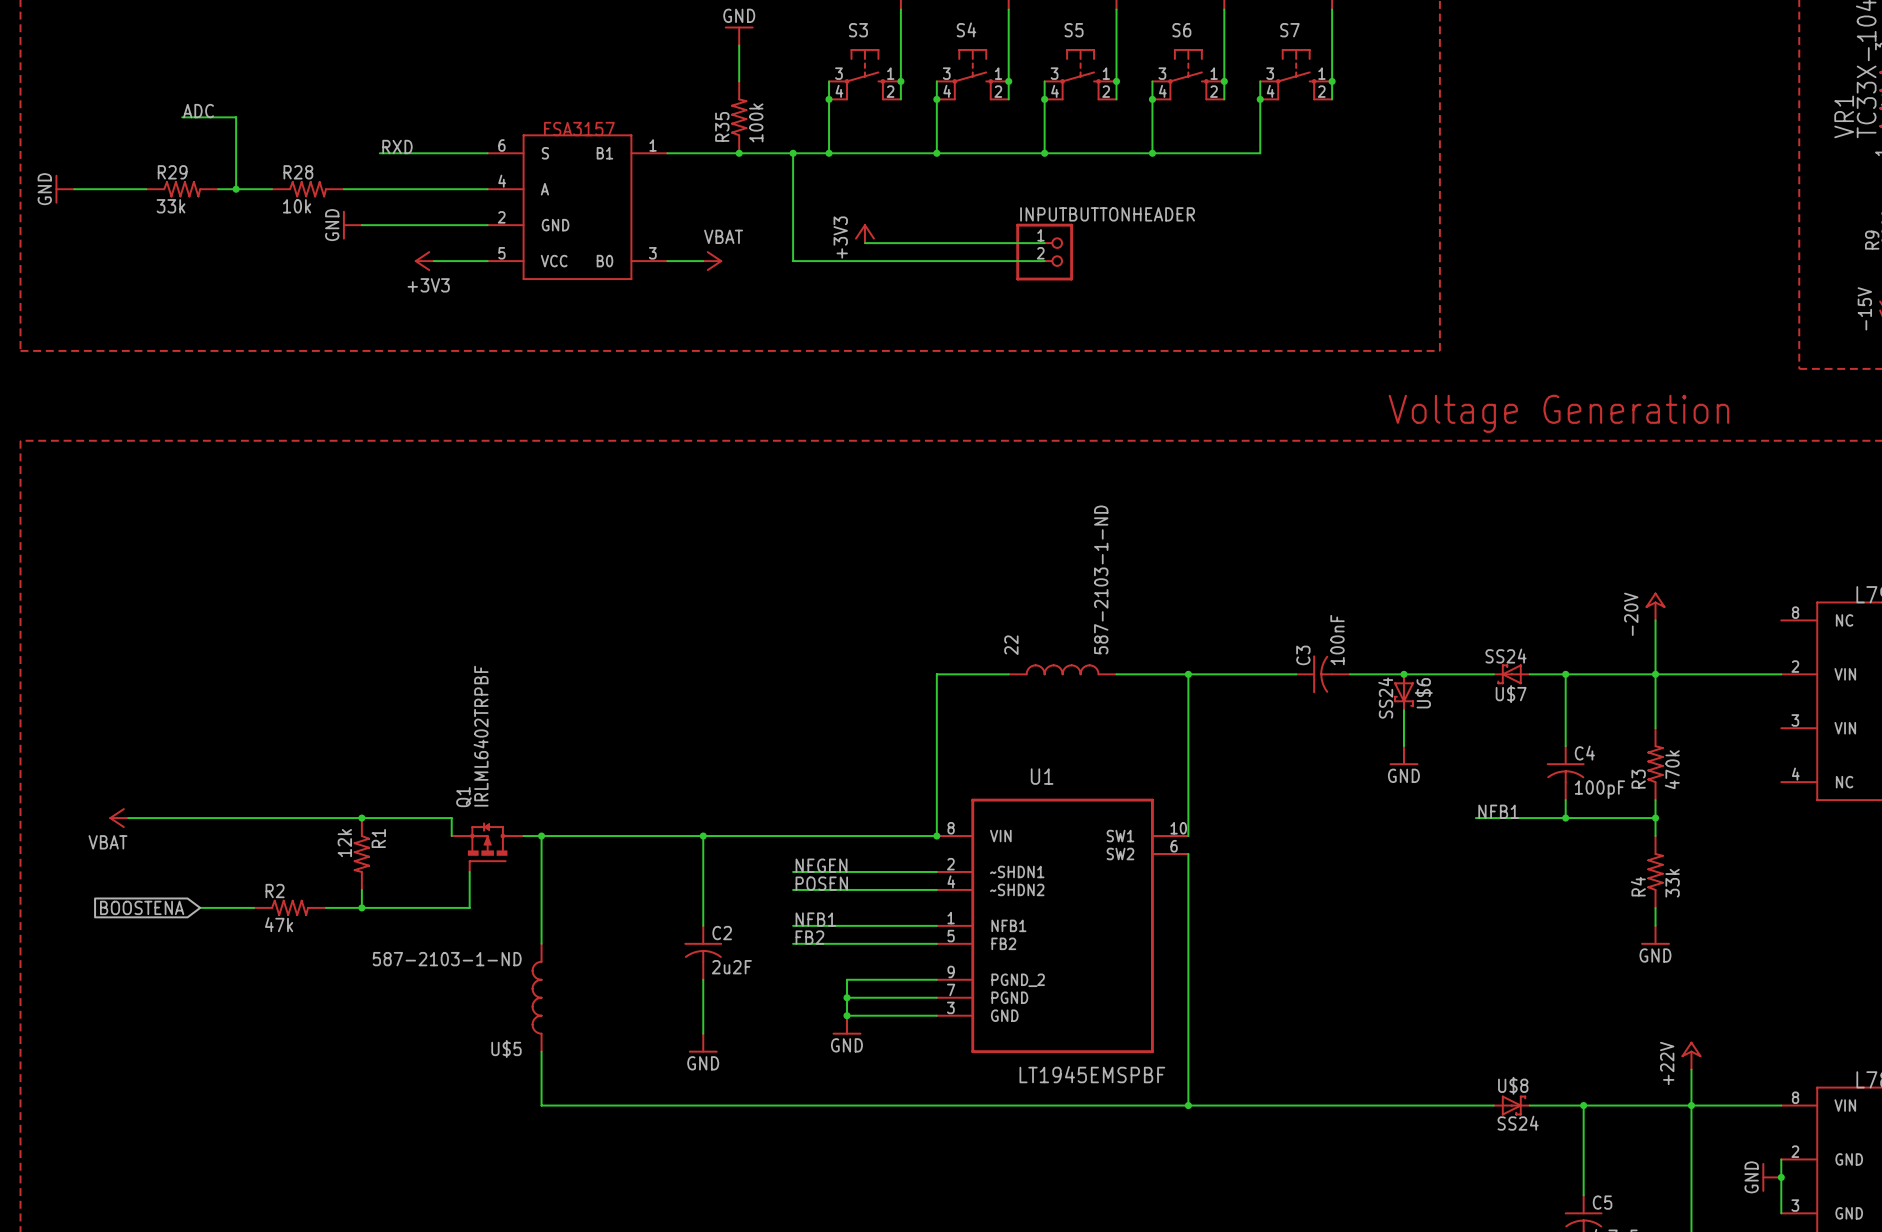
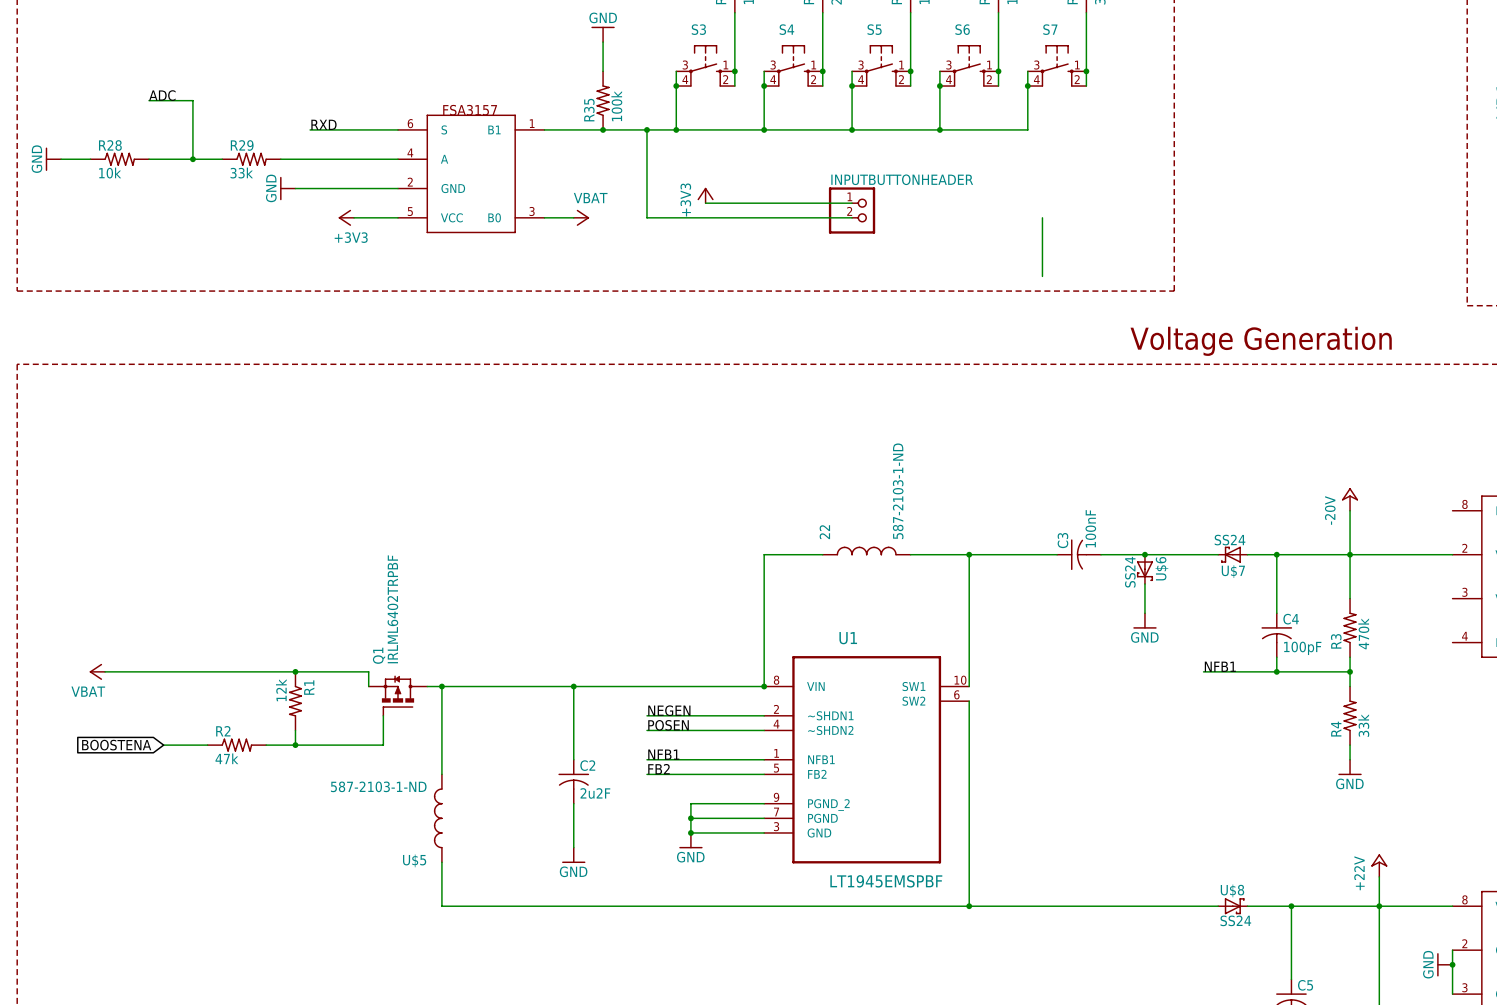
R28 name: R28 (298, 172) -> R29 (242, 145)
R28: none -> 10k (119, 159)
R29: 33k (182, 189) -> none
R28 value: 10k (297, 206) -> 33k (241, 173)
wire: none -> (1042, 217) (1042, 276)

